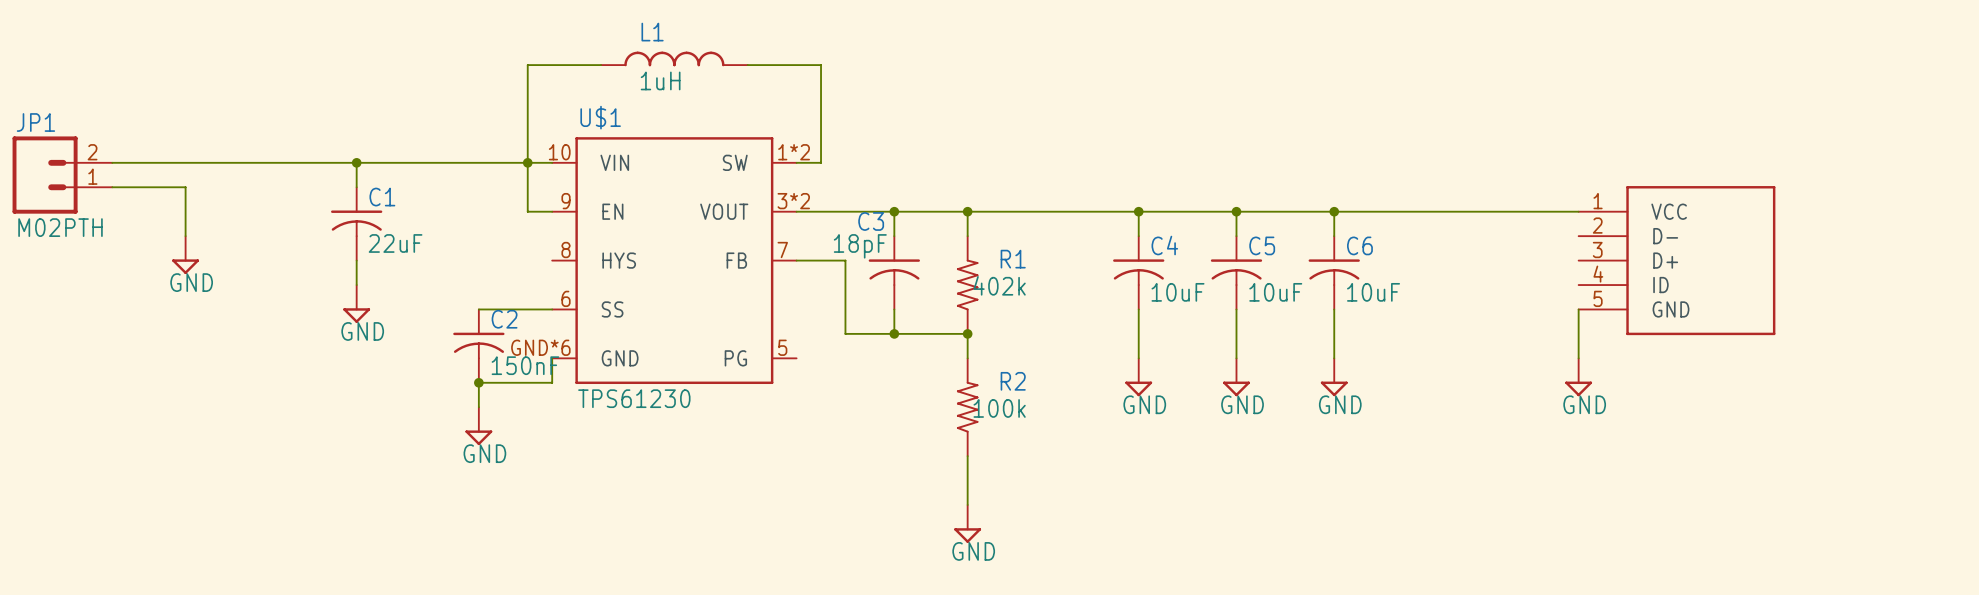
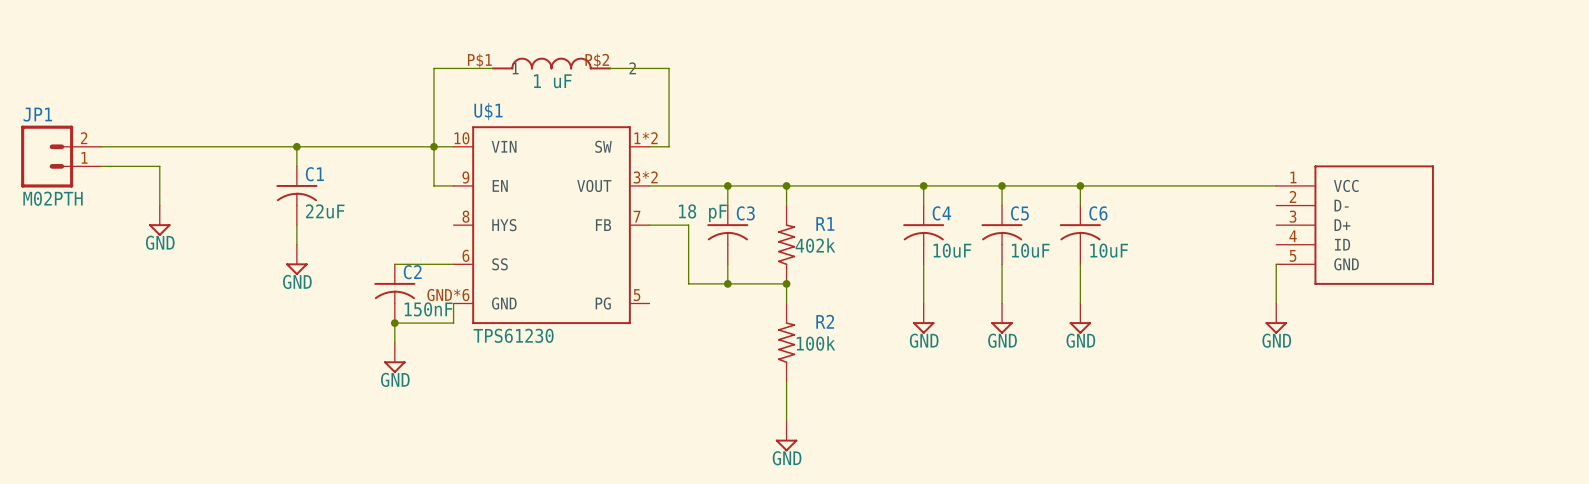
L1: 1uH (674, 58) -> none
part: none -> (551, 63)
text: none -> 1 uF (552, 81)
C3 name position: C3 (871, 221) -> C3 (745, 213)
C3 value: 18pF (860, 246) -> 18 pF (702, 213)

